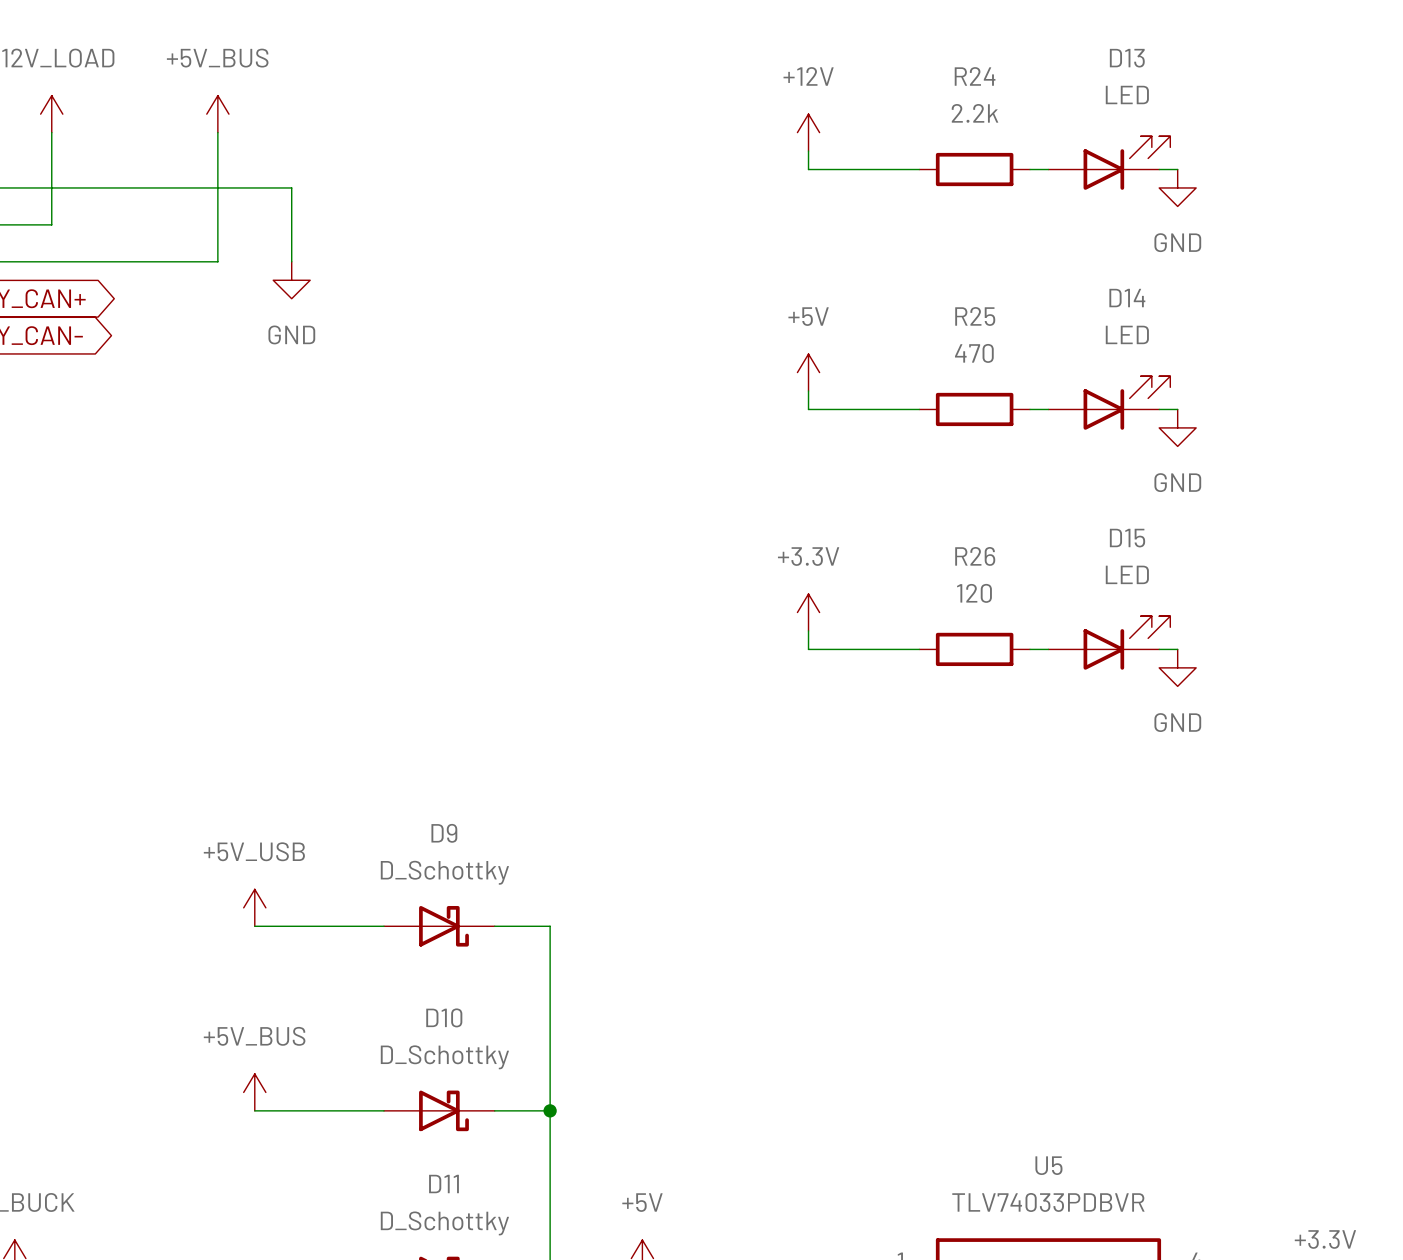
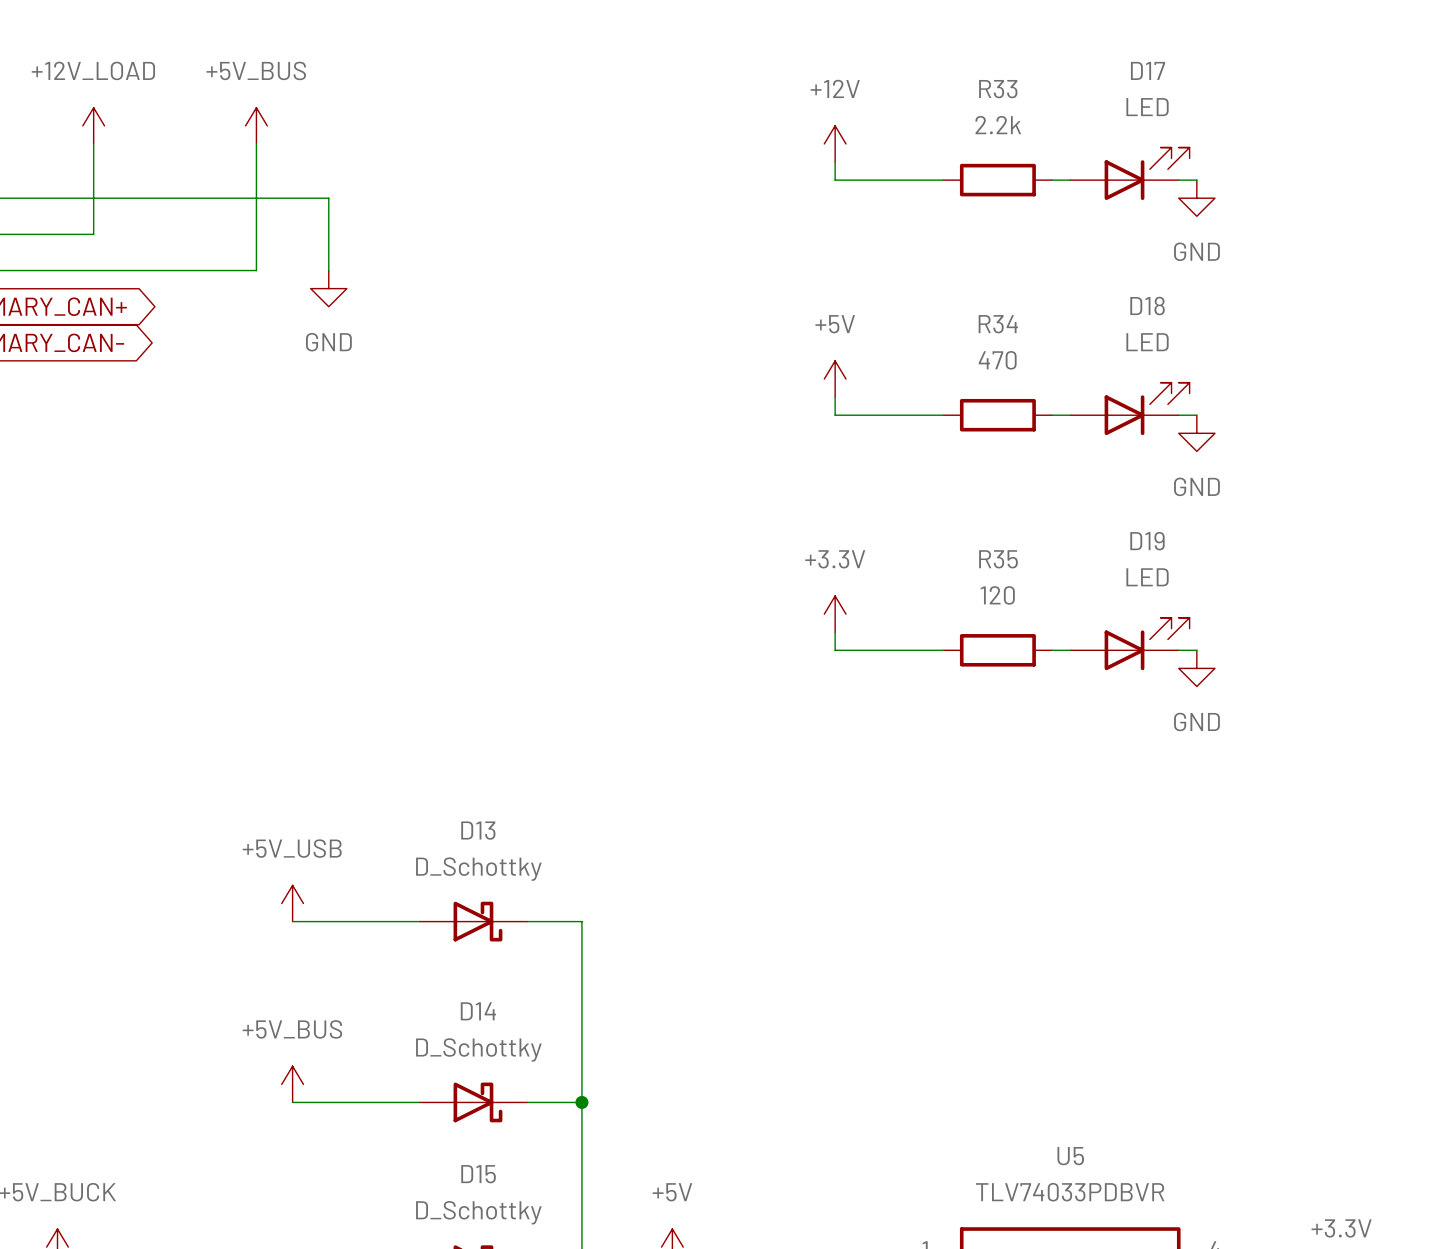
D13 name: D13 (1127, 58) -> D17 (1148, 70)
R24 name: R24 (975, 76) -> R33 (998, 89)
D14 name: D14 (1127, 298) -> D18 (1147, 306)
R25 name: R25 (975, 316) -> R34 (998, 324)
D15 name: D15 (1127, 538) -> D19 (1147, 541)
R26 name: R26 (975, 556) -> R35 (998, 559)
D9 name: D9 (444, 833) -> D13 (478, 830)
D10 name: D10 (444, 1017) -> D14 (478, 1011)
D11 name: D11 (443, 1184) -> D15 (478, 1174)

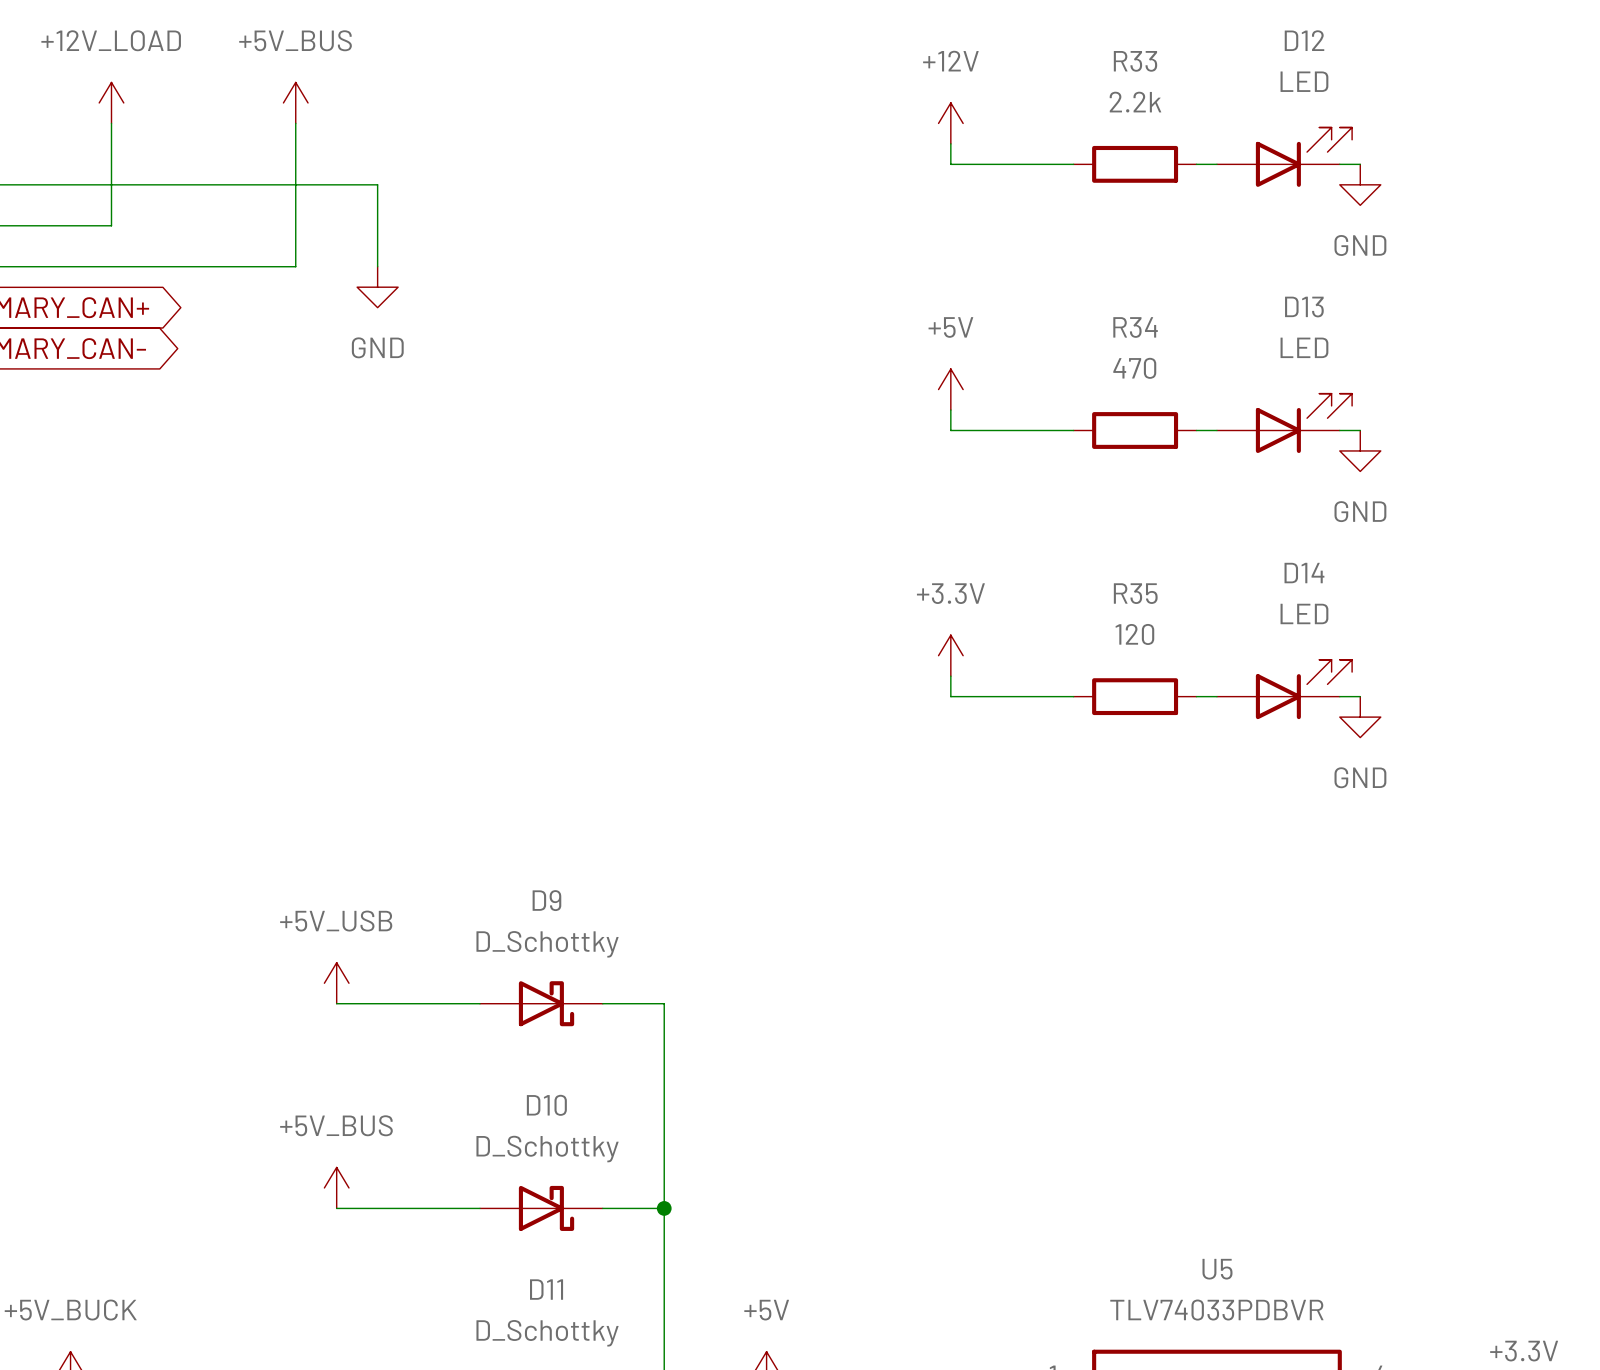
D17 name: D17 (1148, 70) -> D12 (1304, 40)
D18 name: D18 (1147, 306) -> D13 (1304, 307)
D19 name: D19 (1147, 541) -> D14 (1304, 573)
D13 name: D13 (478, 830) -> D9 (546, 900)
D14 name: D14 (478, 1011) -> D10 (546, 1105)
D15 name: D15 (478, 1174) -> D11 (546, 1289)

